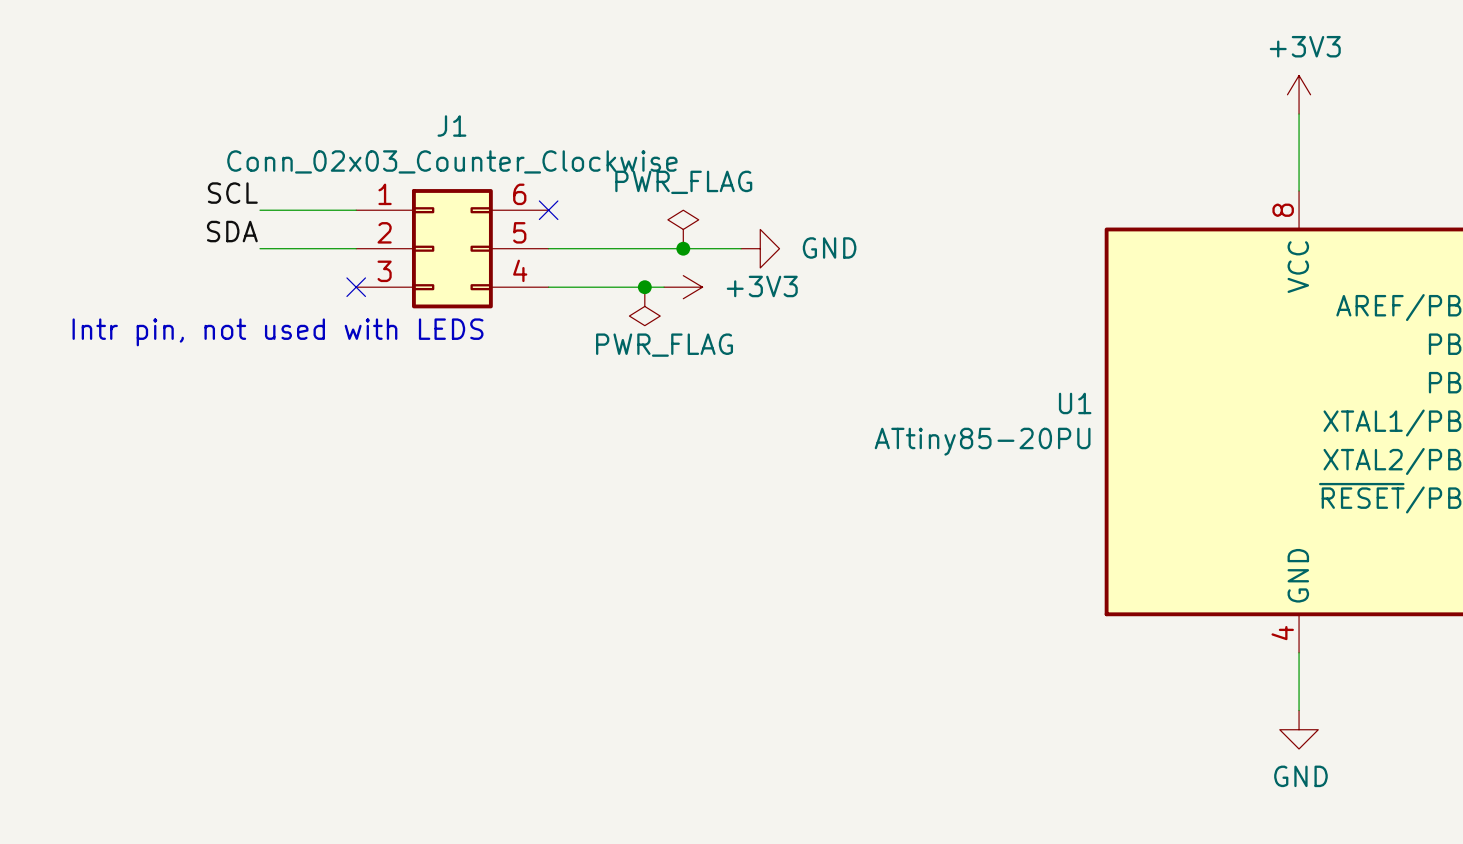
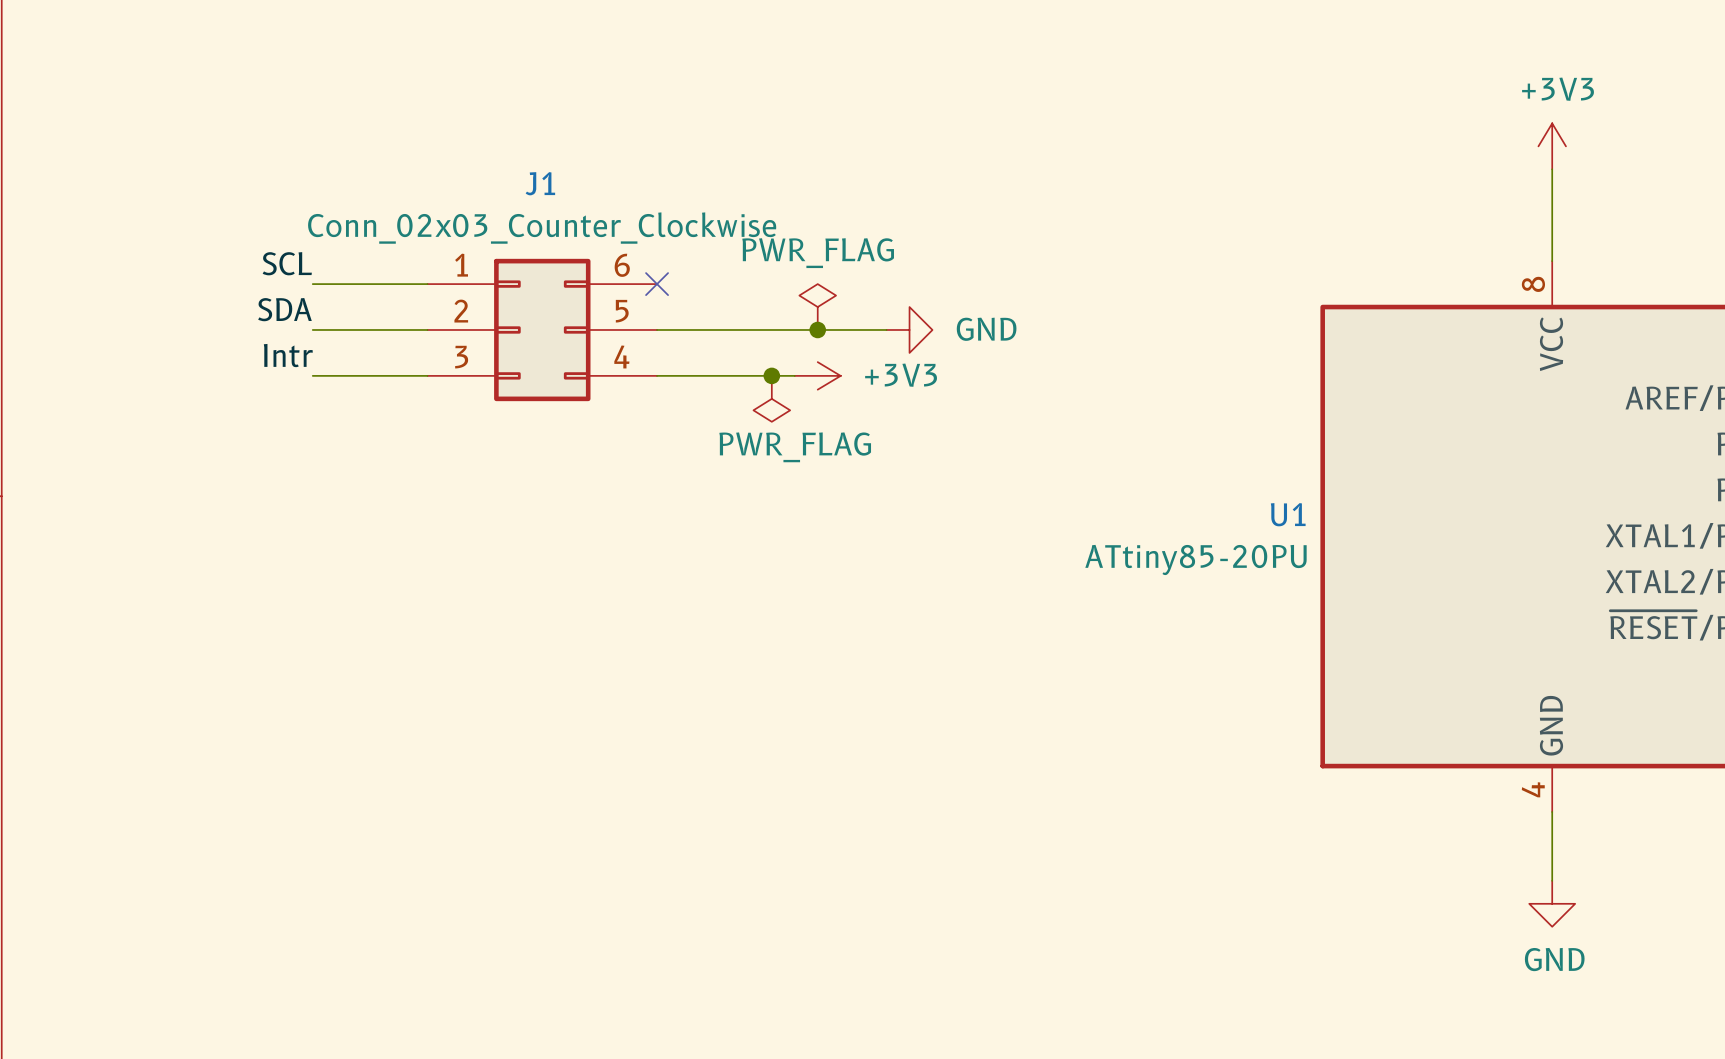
label: none -> Intr (288, 355)
wire: none -> (312, 375) (427, 375)
no-connect mark: (356, 287) -> none
text: Intr pin, not used with LEDS (278, 332) -> none

